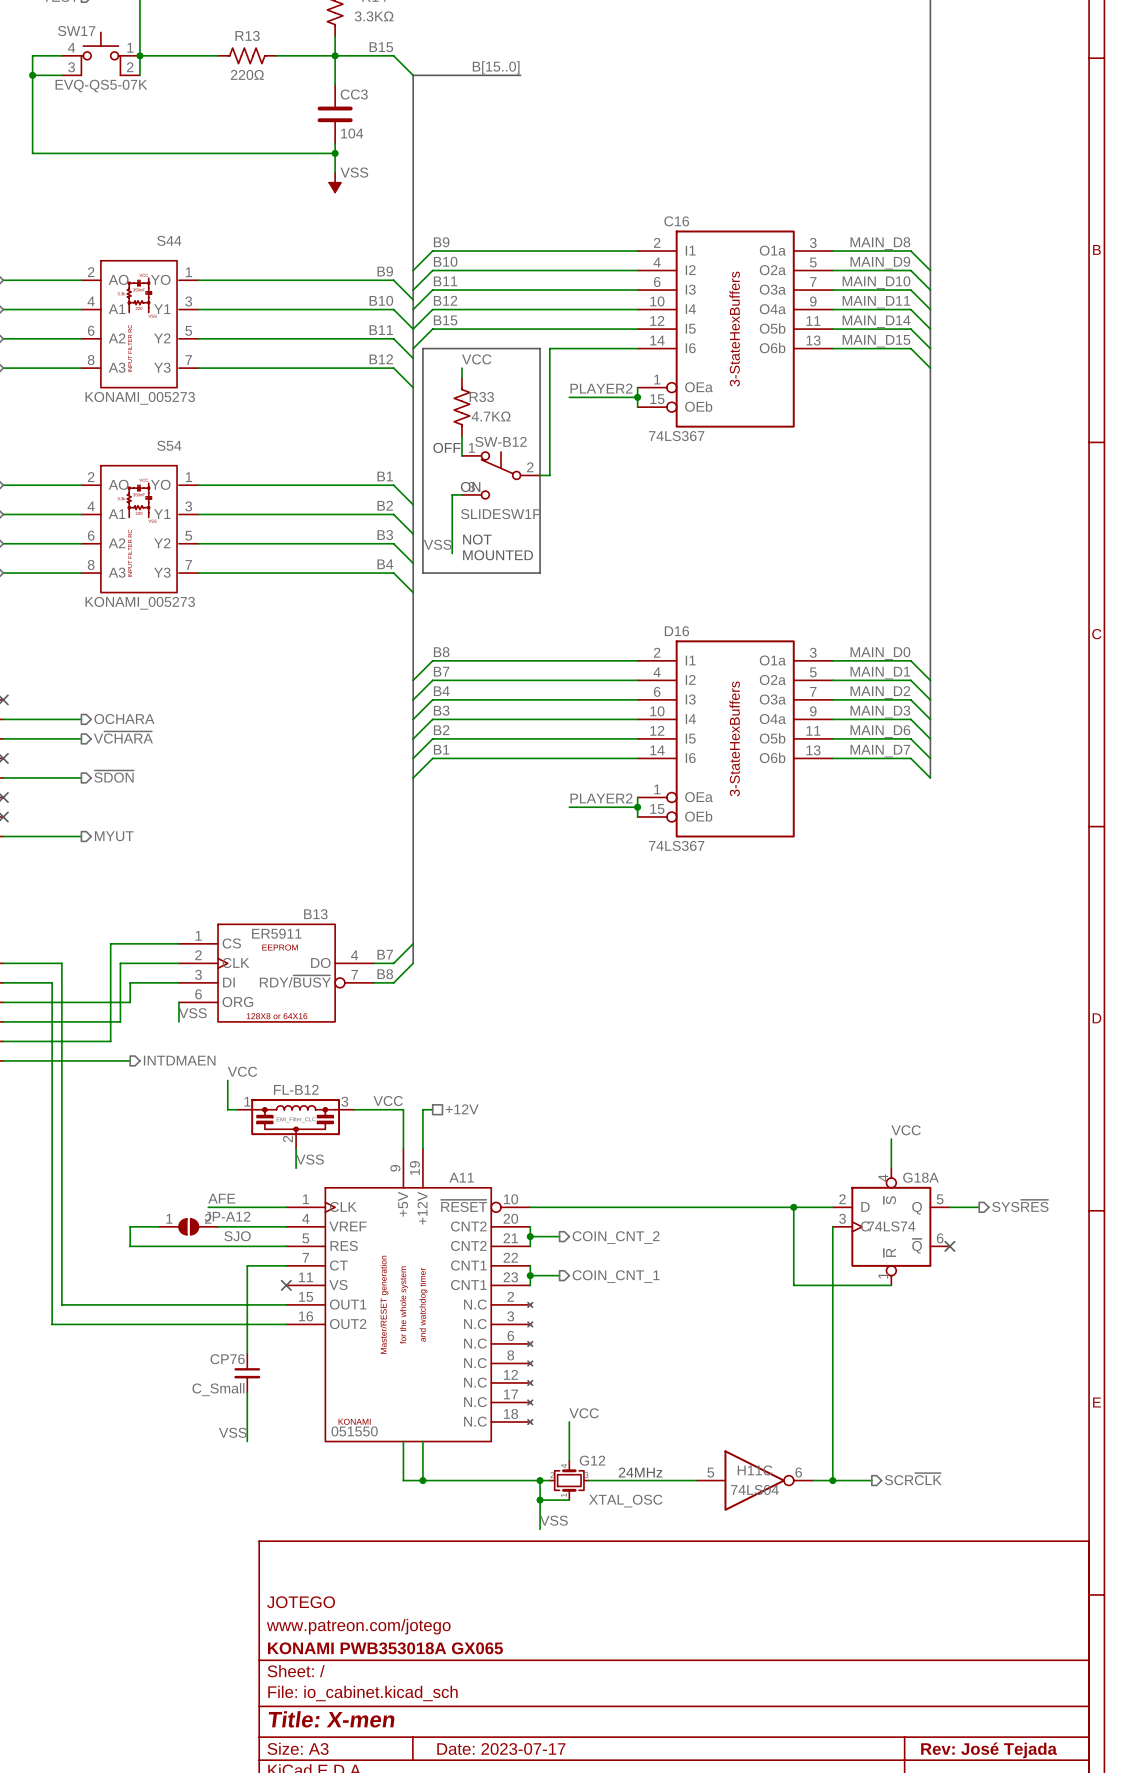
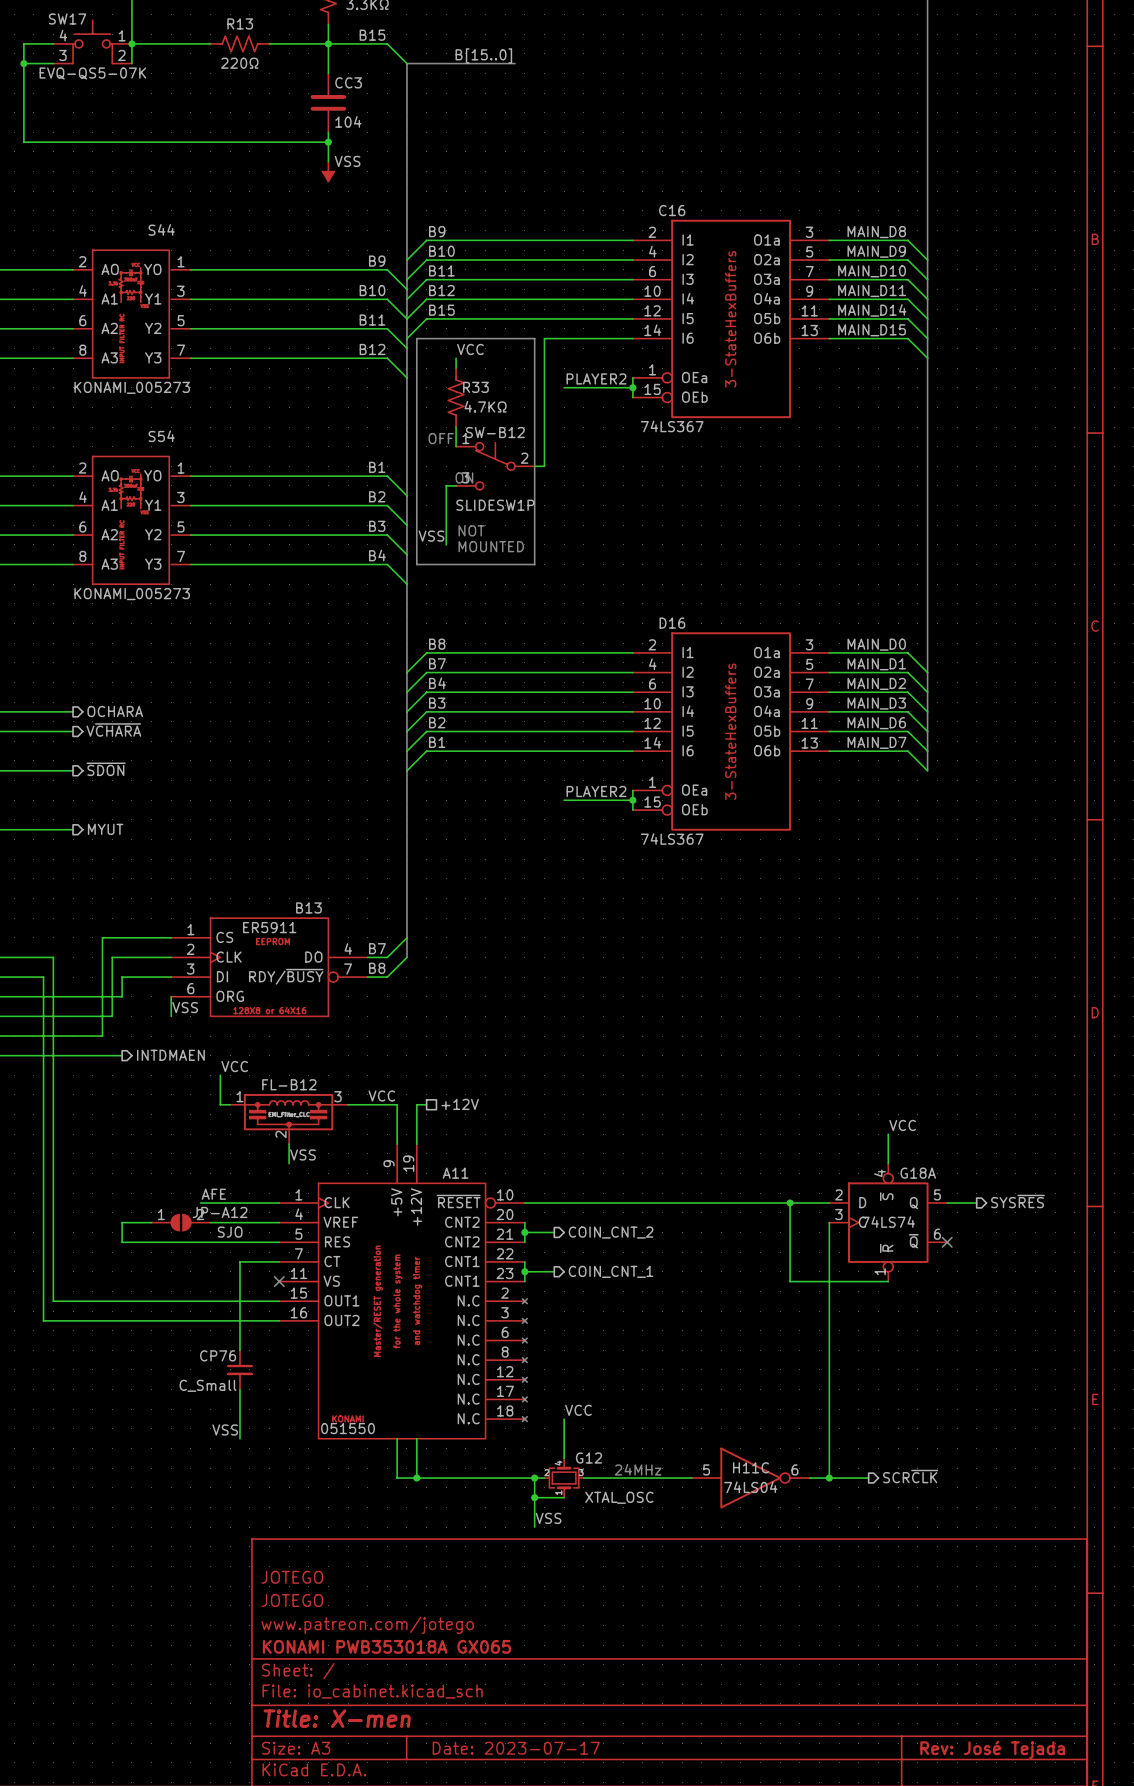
title block: none -> JOTEGO (292, 1577)

